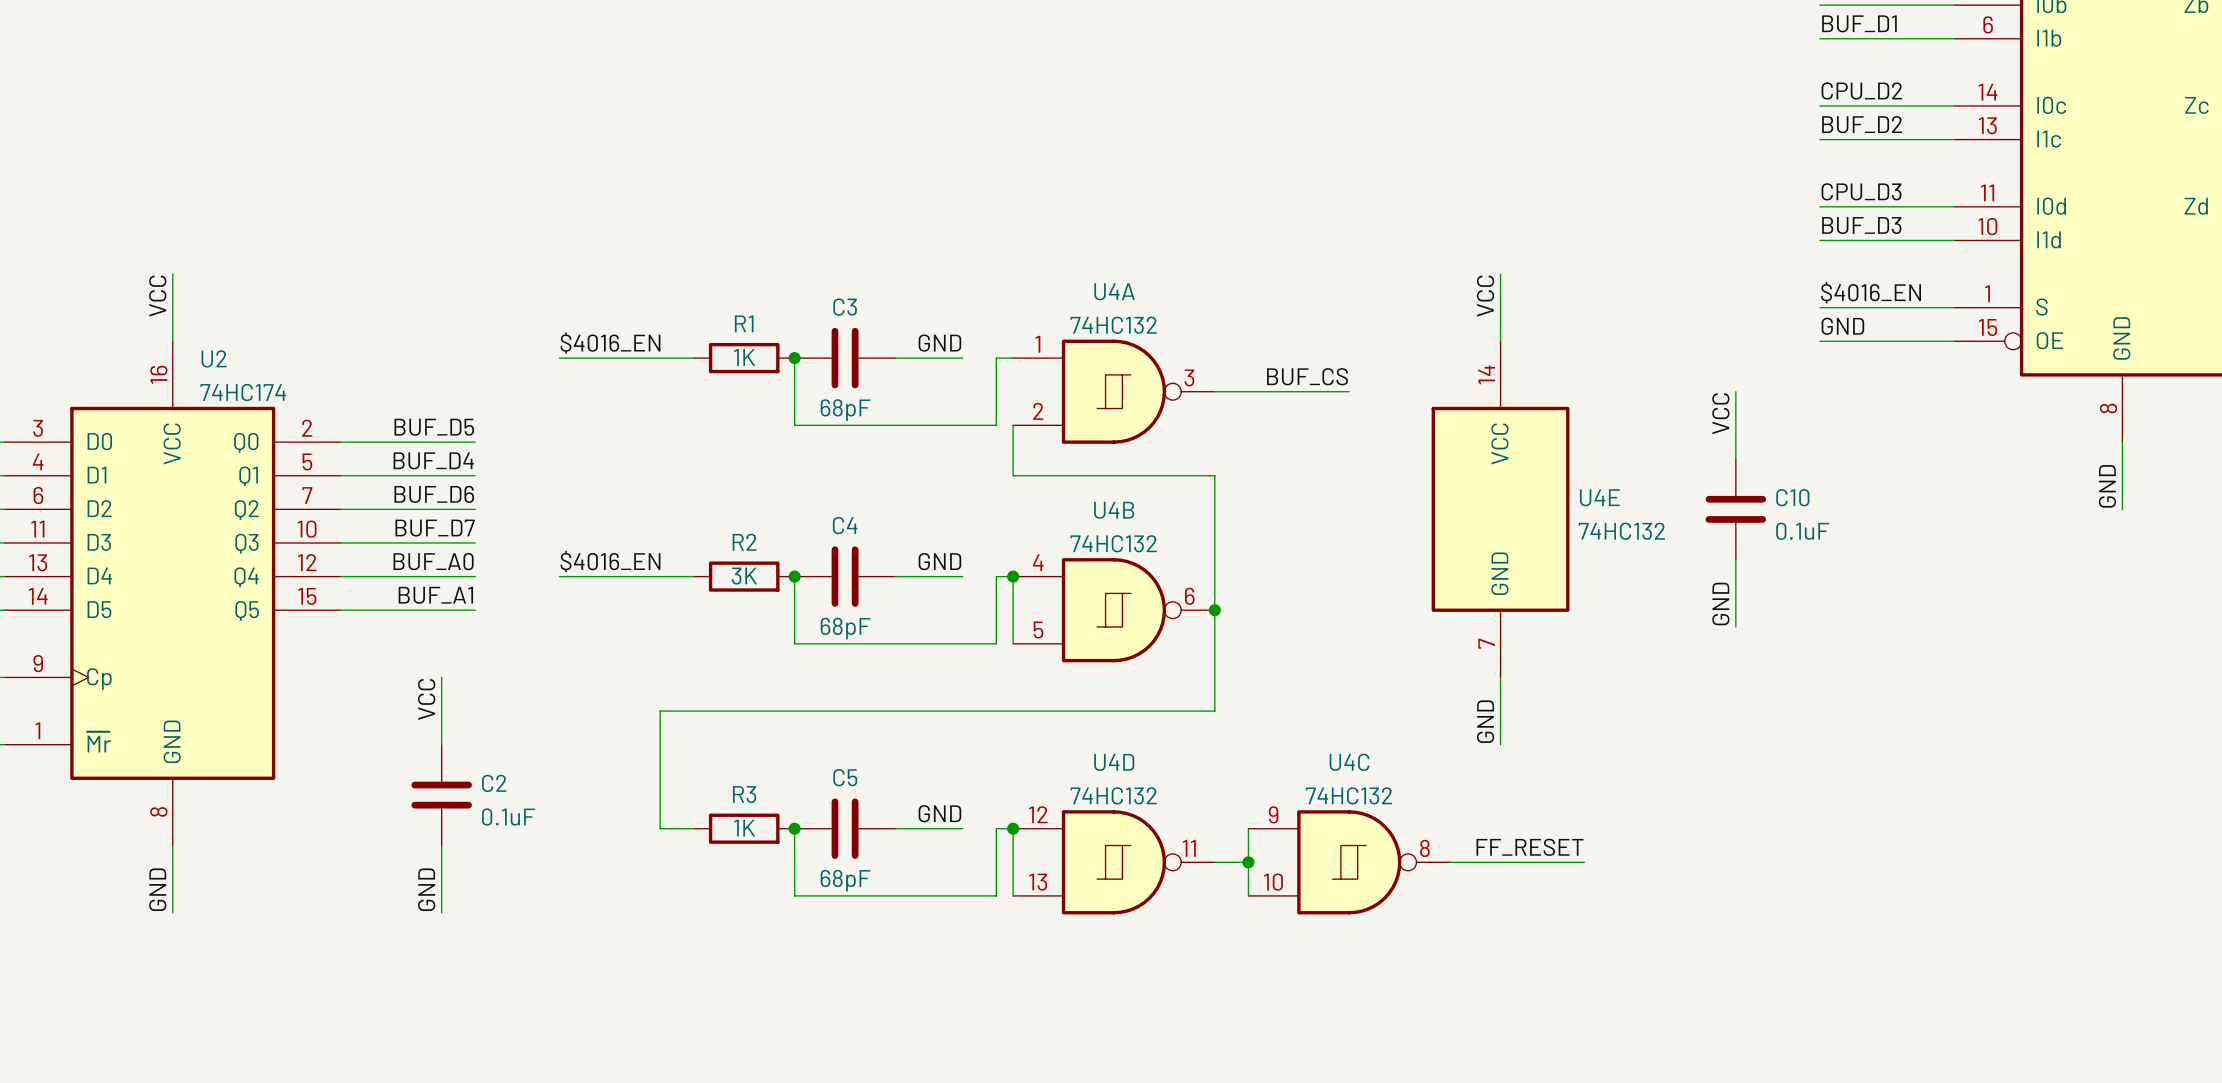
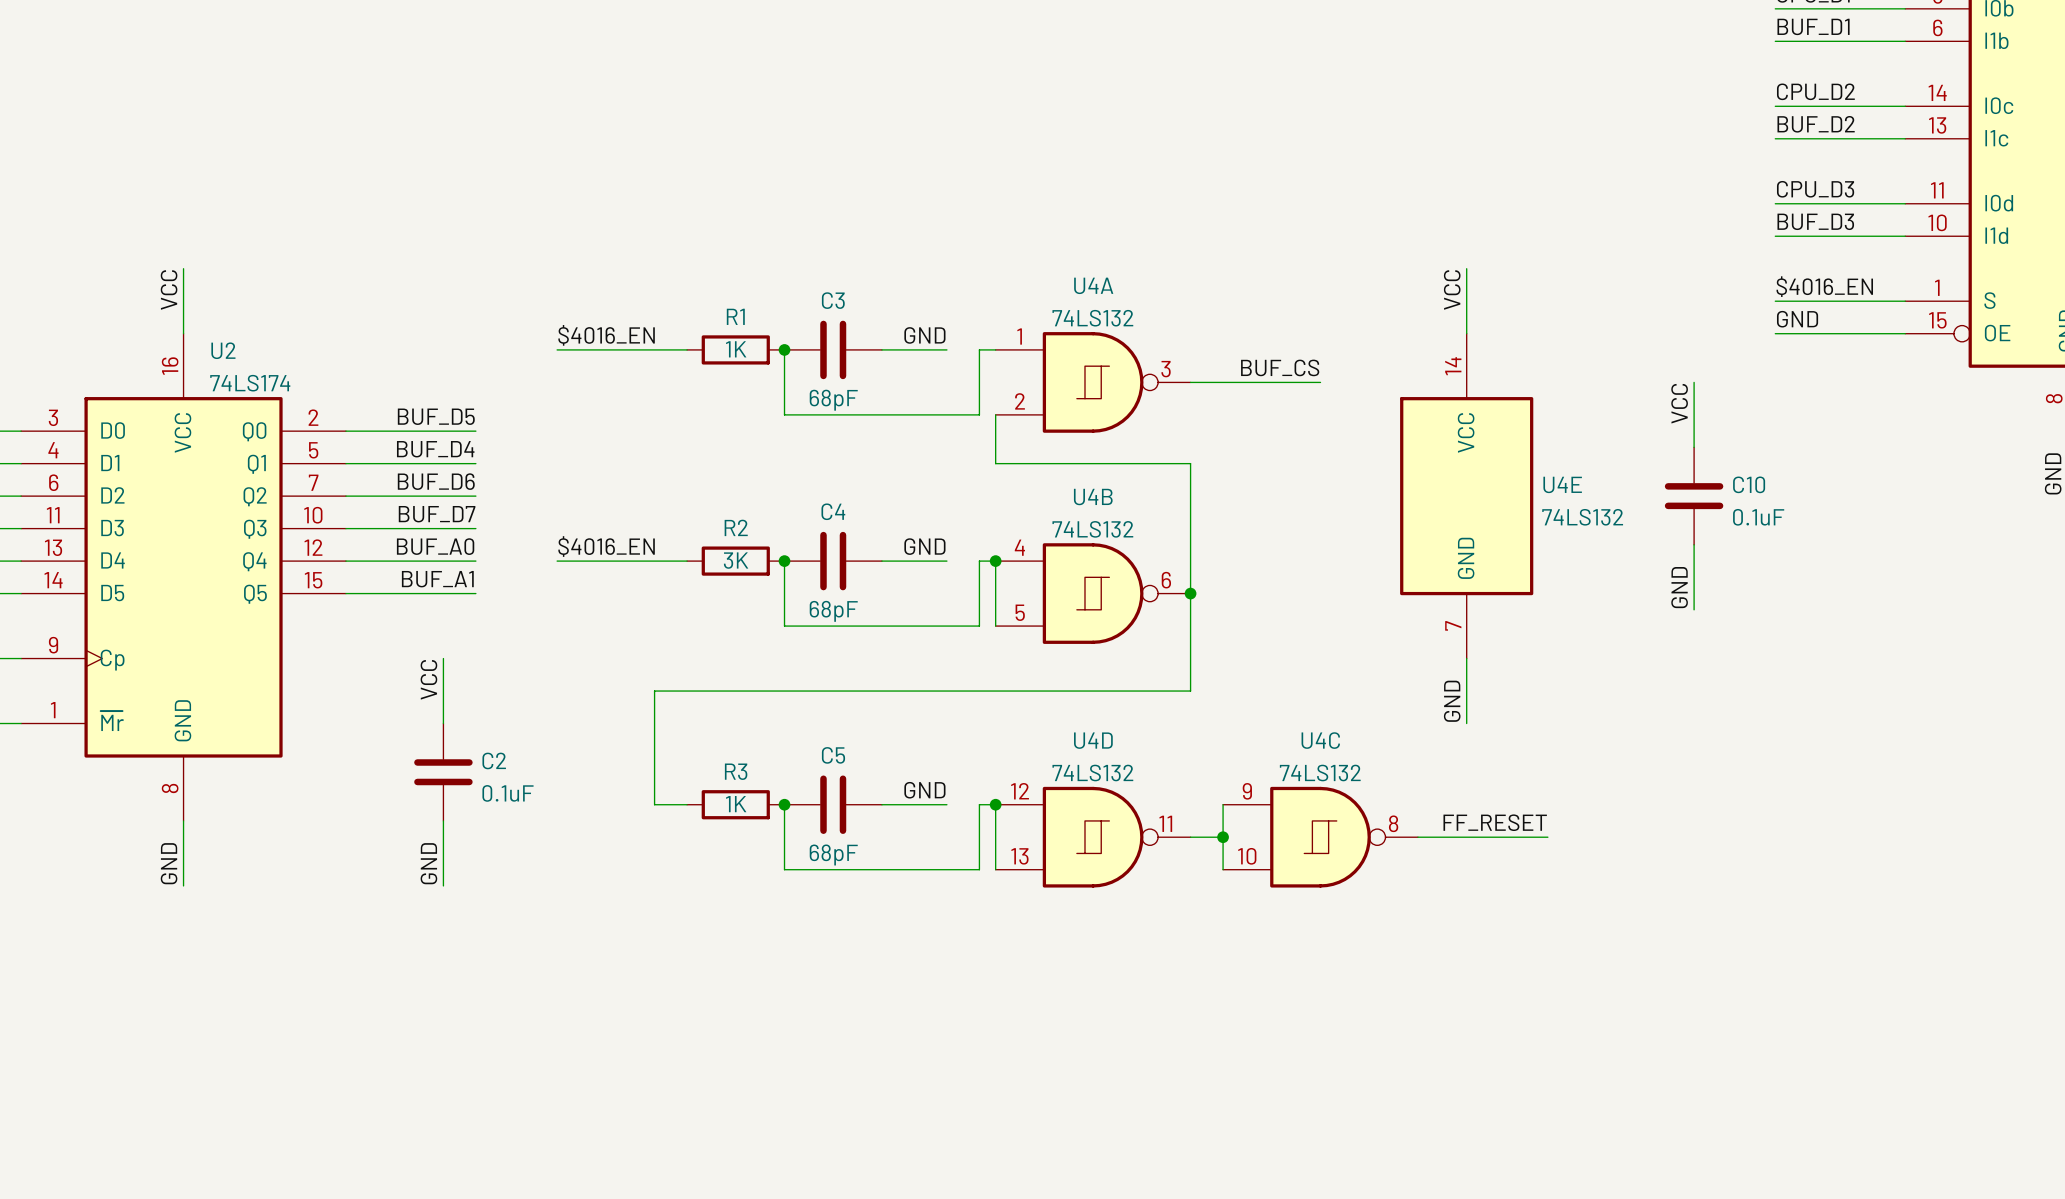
U4A value: 74HC132 (1113, 325) -> 74LS132 (1092, 318)
U2 value: 74HC174 (243, 392) -> 74LS174 (250, 383)
U4E value: 74HC132 (1621, 531) -> 74LS132 (1582, 517)
U4B value: 74HC132 (1113, 543) -> 74LS132 (1092, 529)
U4D value: 74HC132 (1113, 795) -> 74LS132 (1092, 773)
U4C value: 74HC132 (1349, 795) -> 74LS132 (1320, 773)

